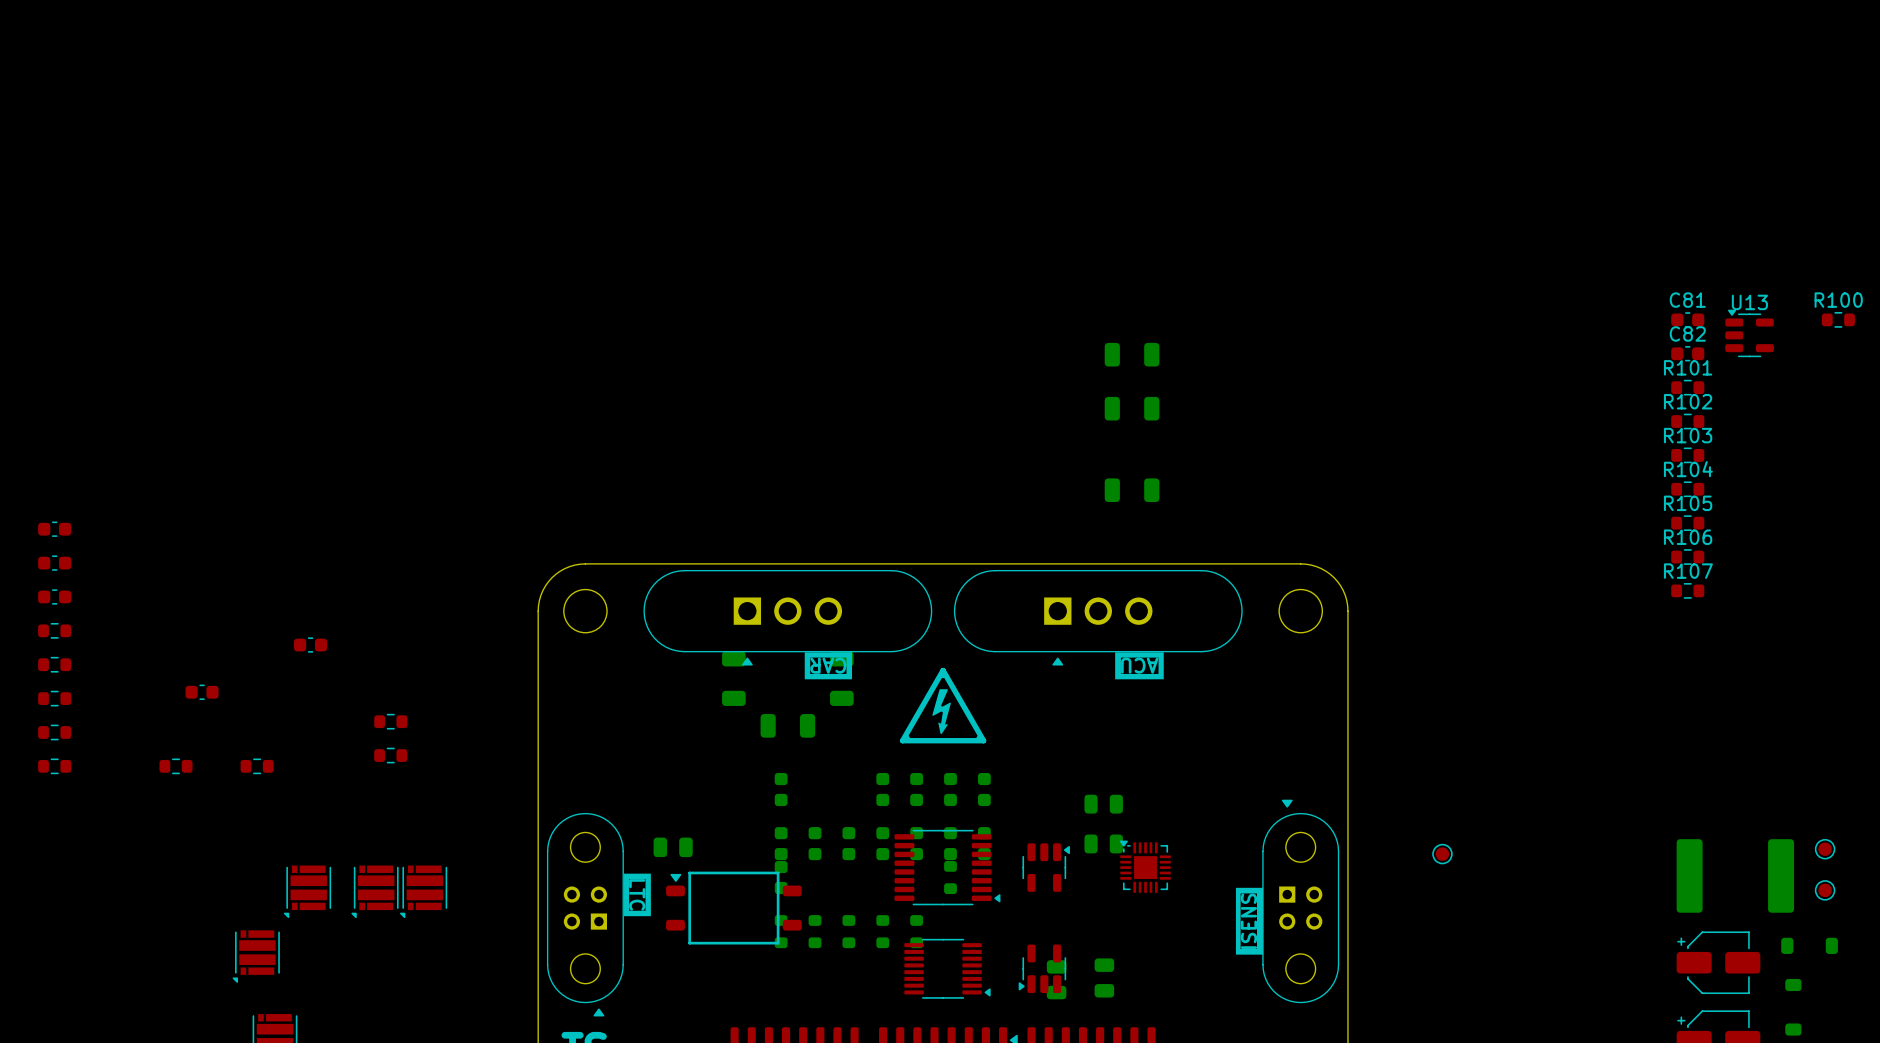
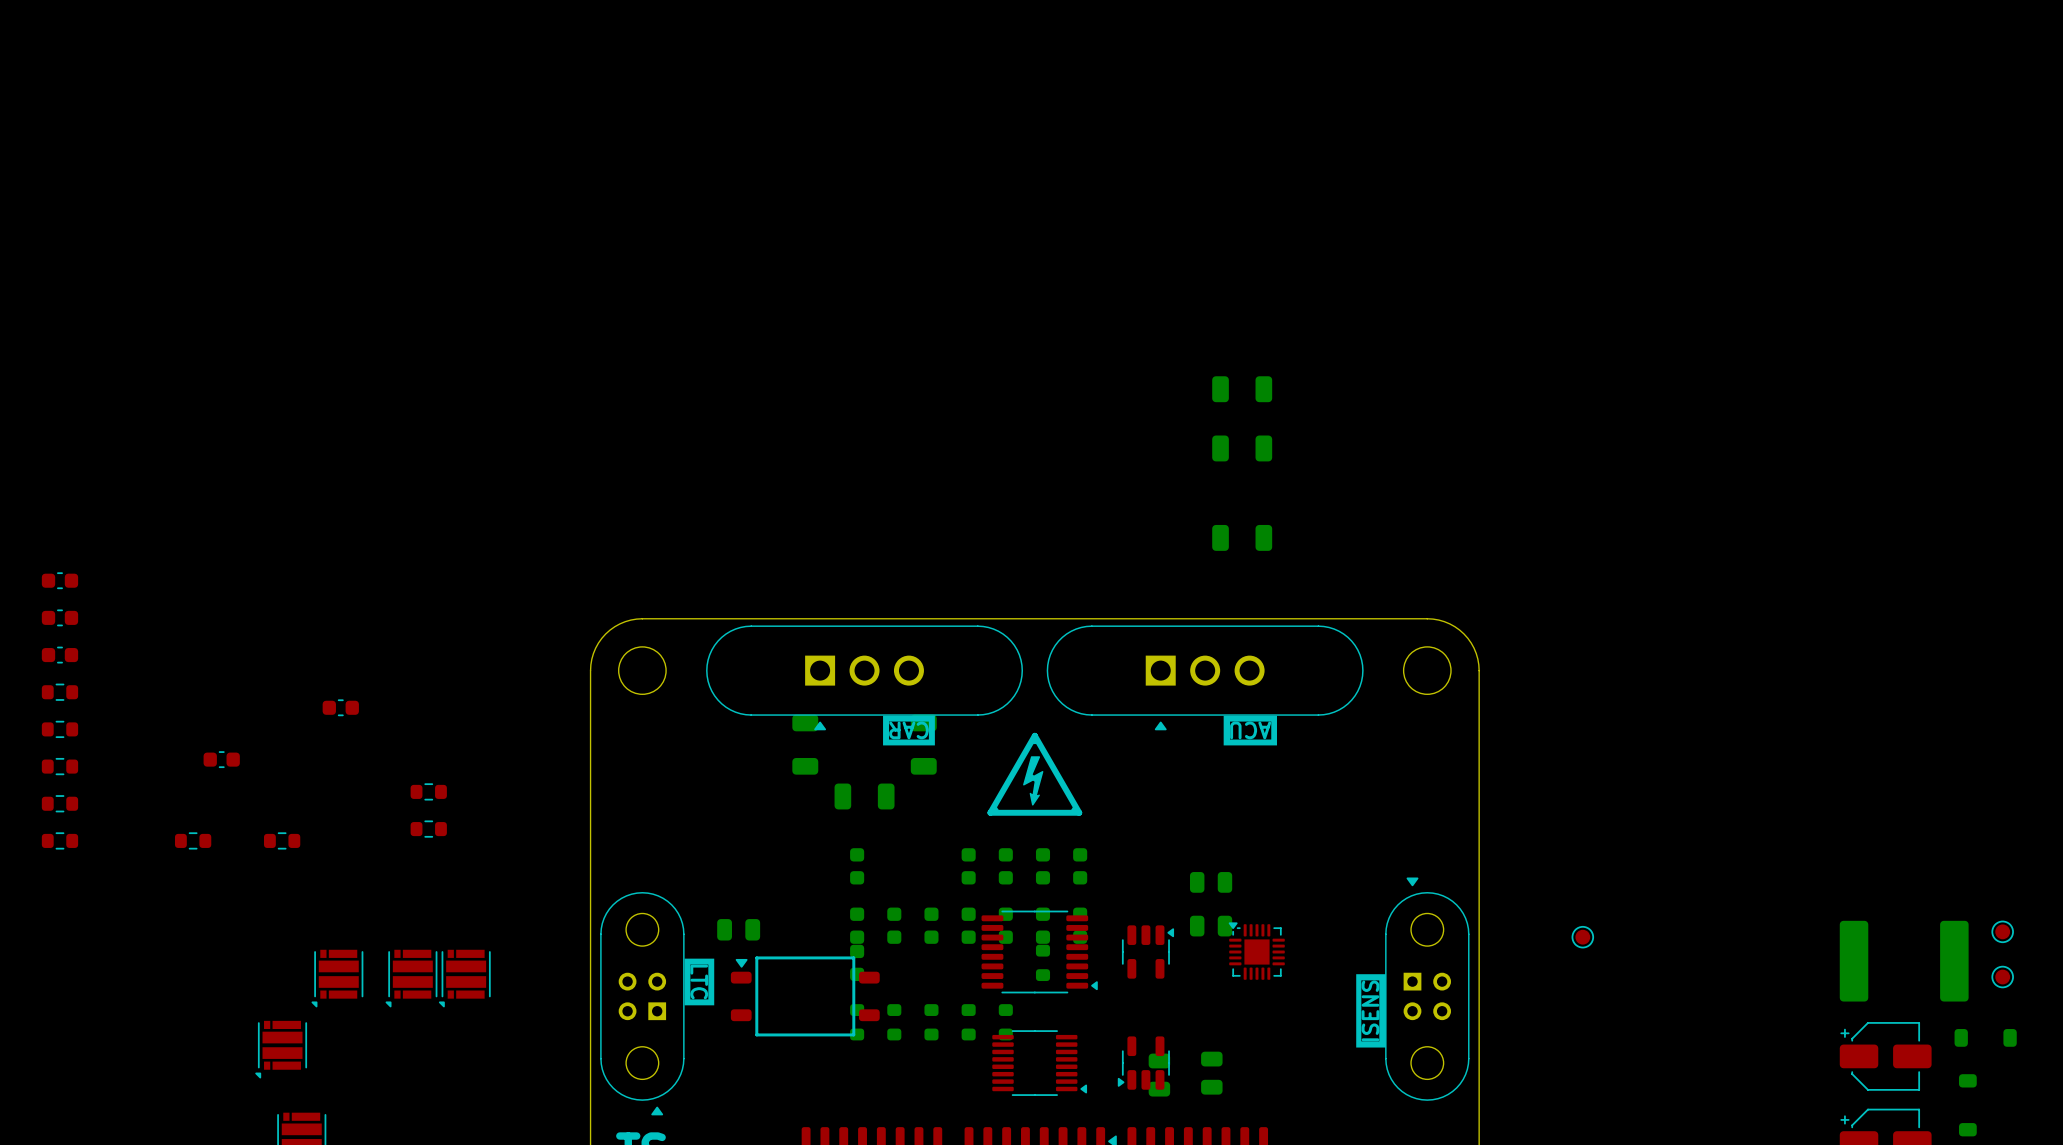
C81: (1687, 319) -> none
R100: (1838, 319) -> none
U13: (1749, 333) -> none
C82: (1687, 353) -> none
R101: (1687, 387) -> none
R102: (1687, 421) -> none
R103: (1687, 455) -> none
R104: (1687, 489) -> none
R105: (1687, 523) -> none
R106: (1687, 557) -> none
R107: (1687, 590) -> none

